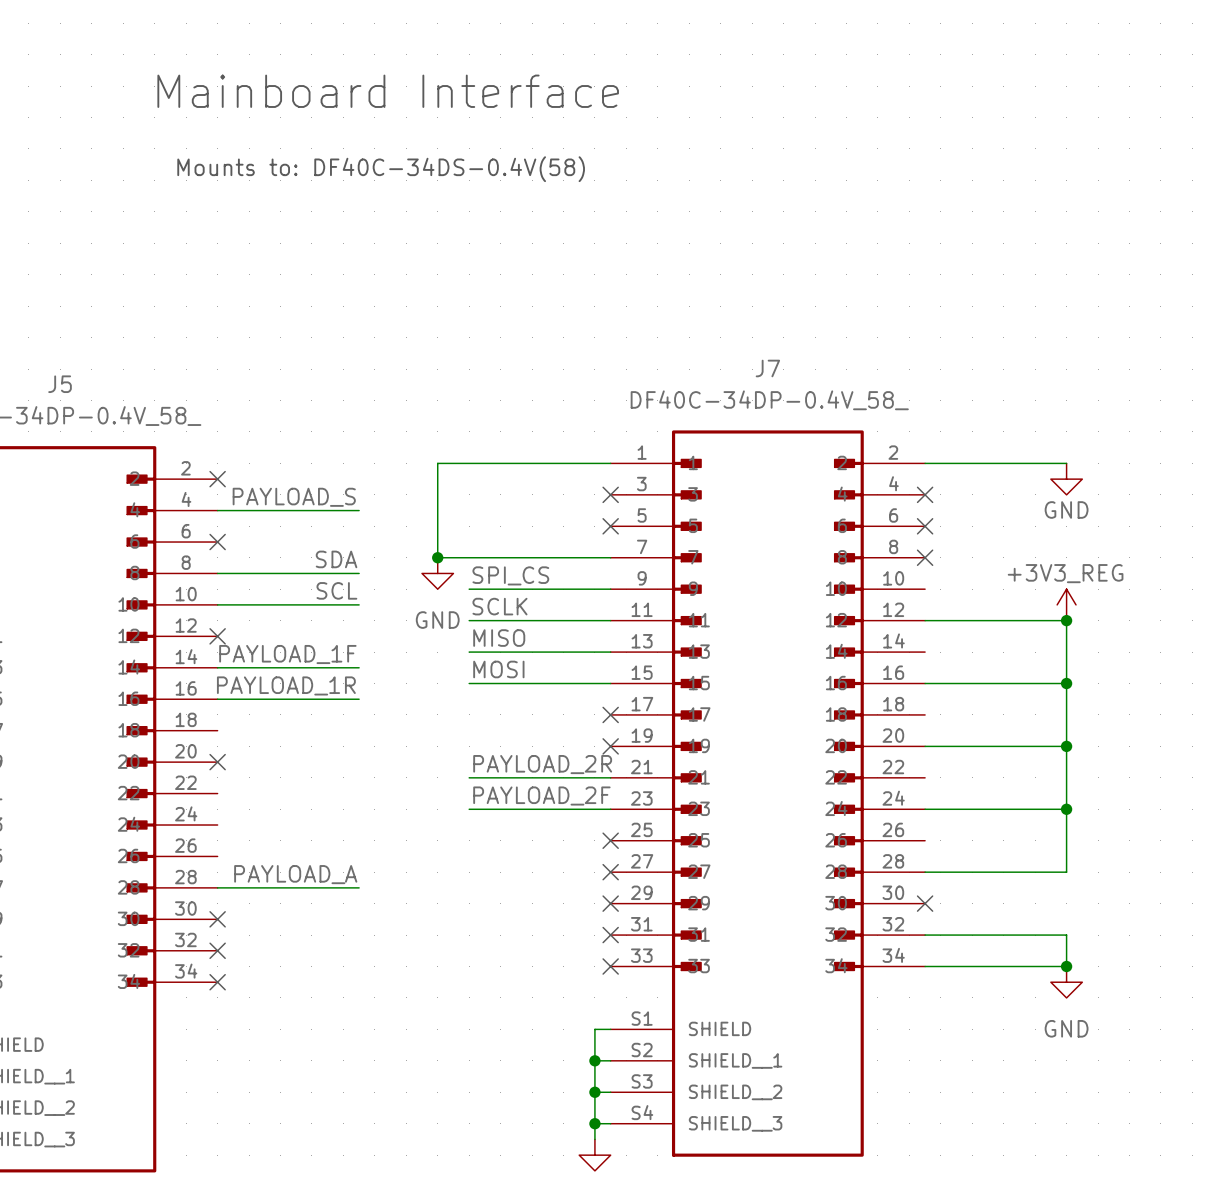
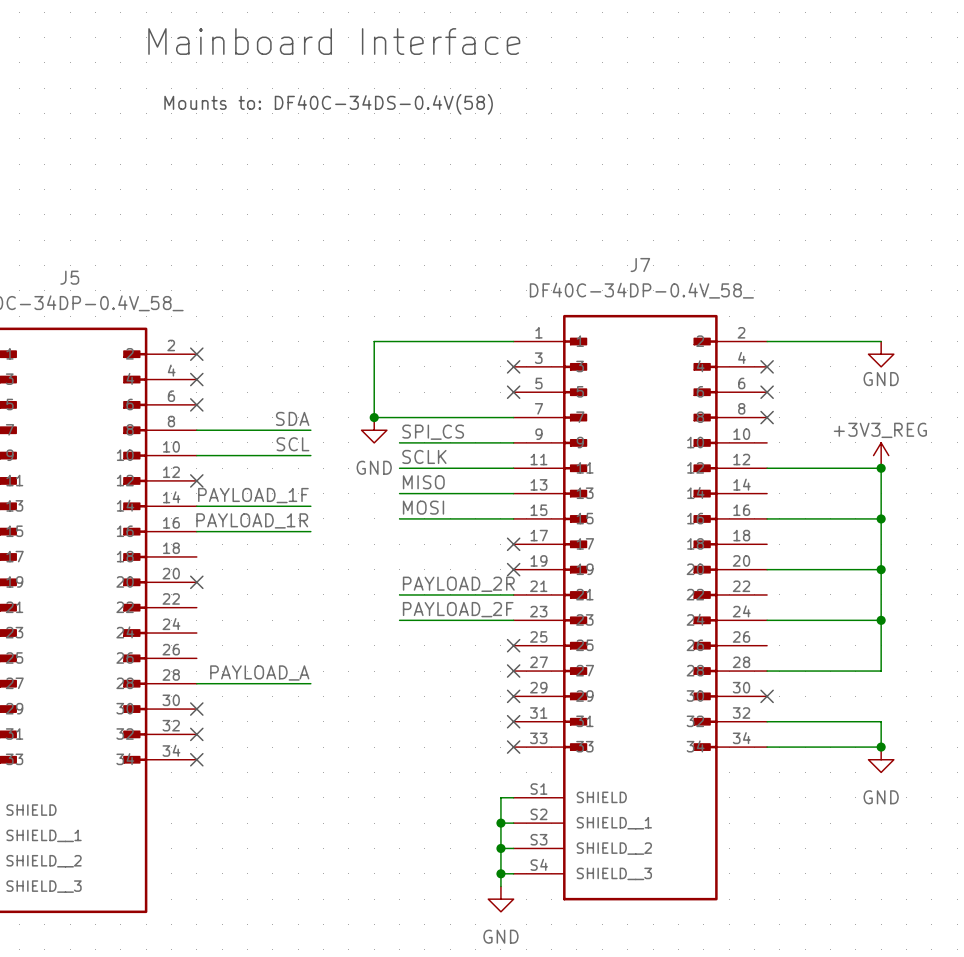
label: PAYLOAD_S (294, 497) -> none
wire: (217, 510) (359, 510) -> none
no-connect mark: none -> (196, 379)

